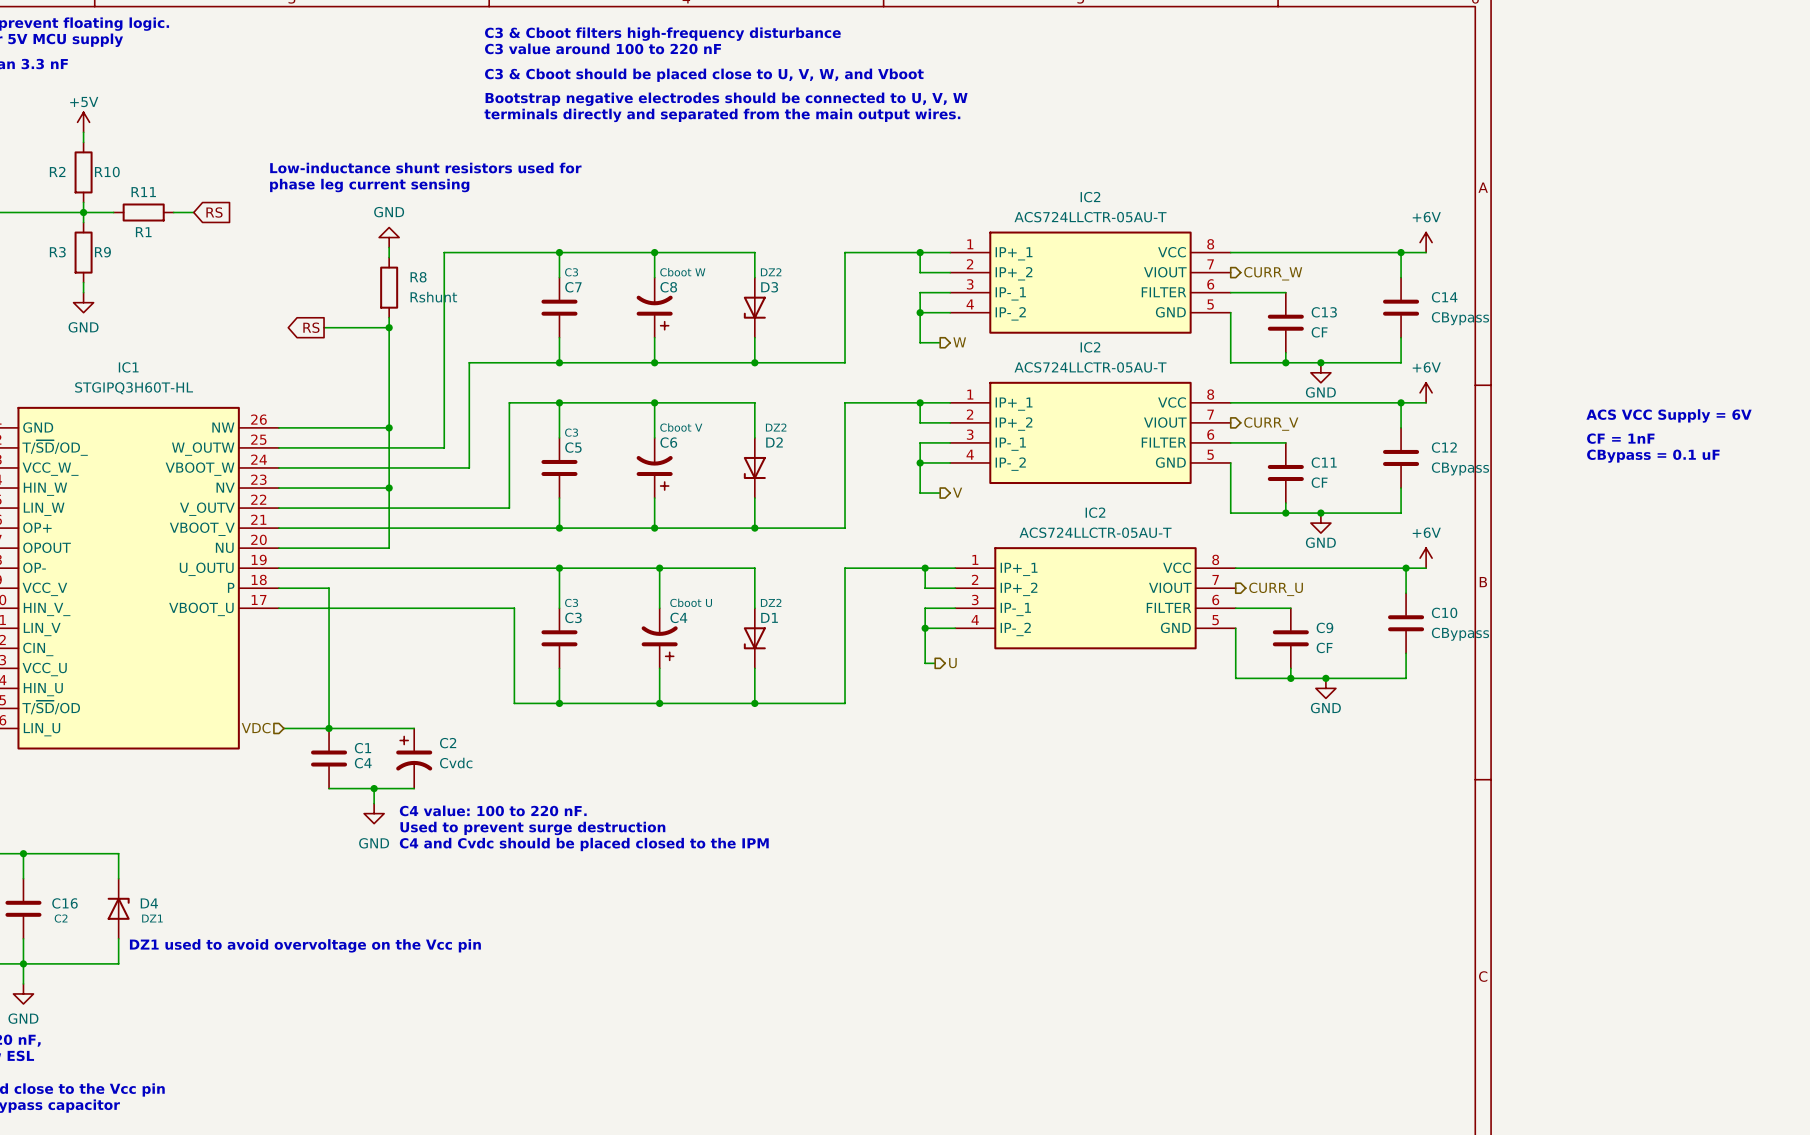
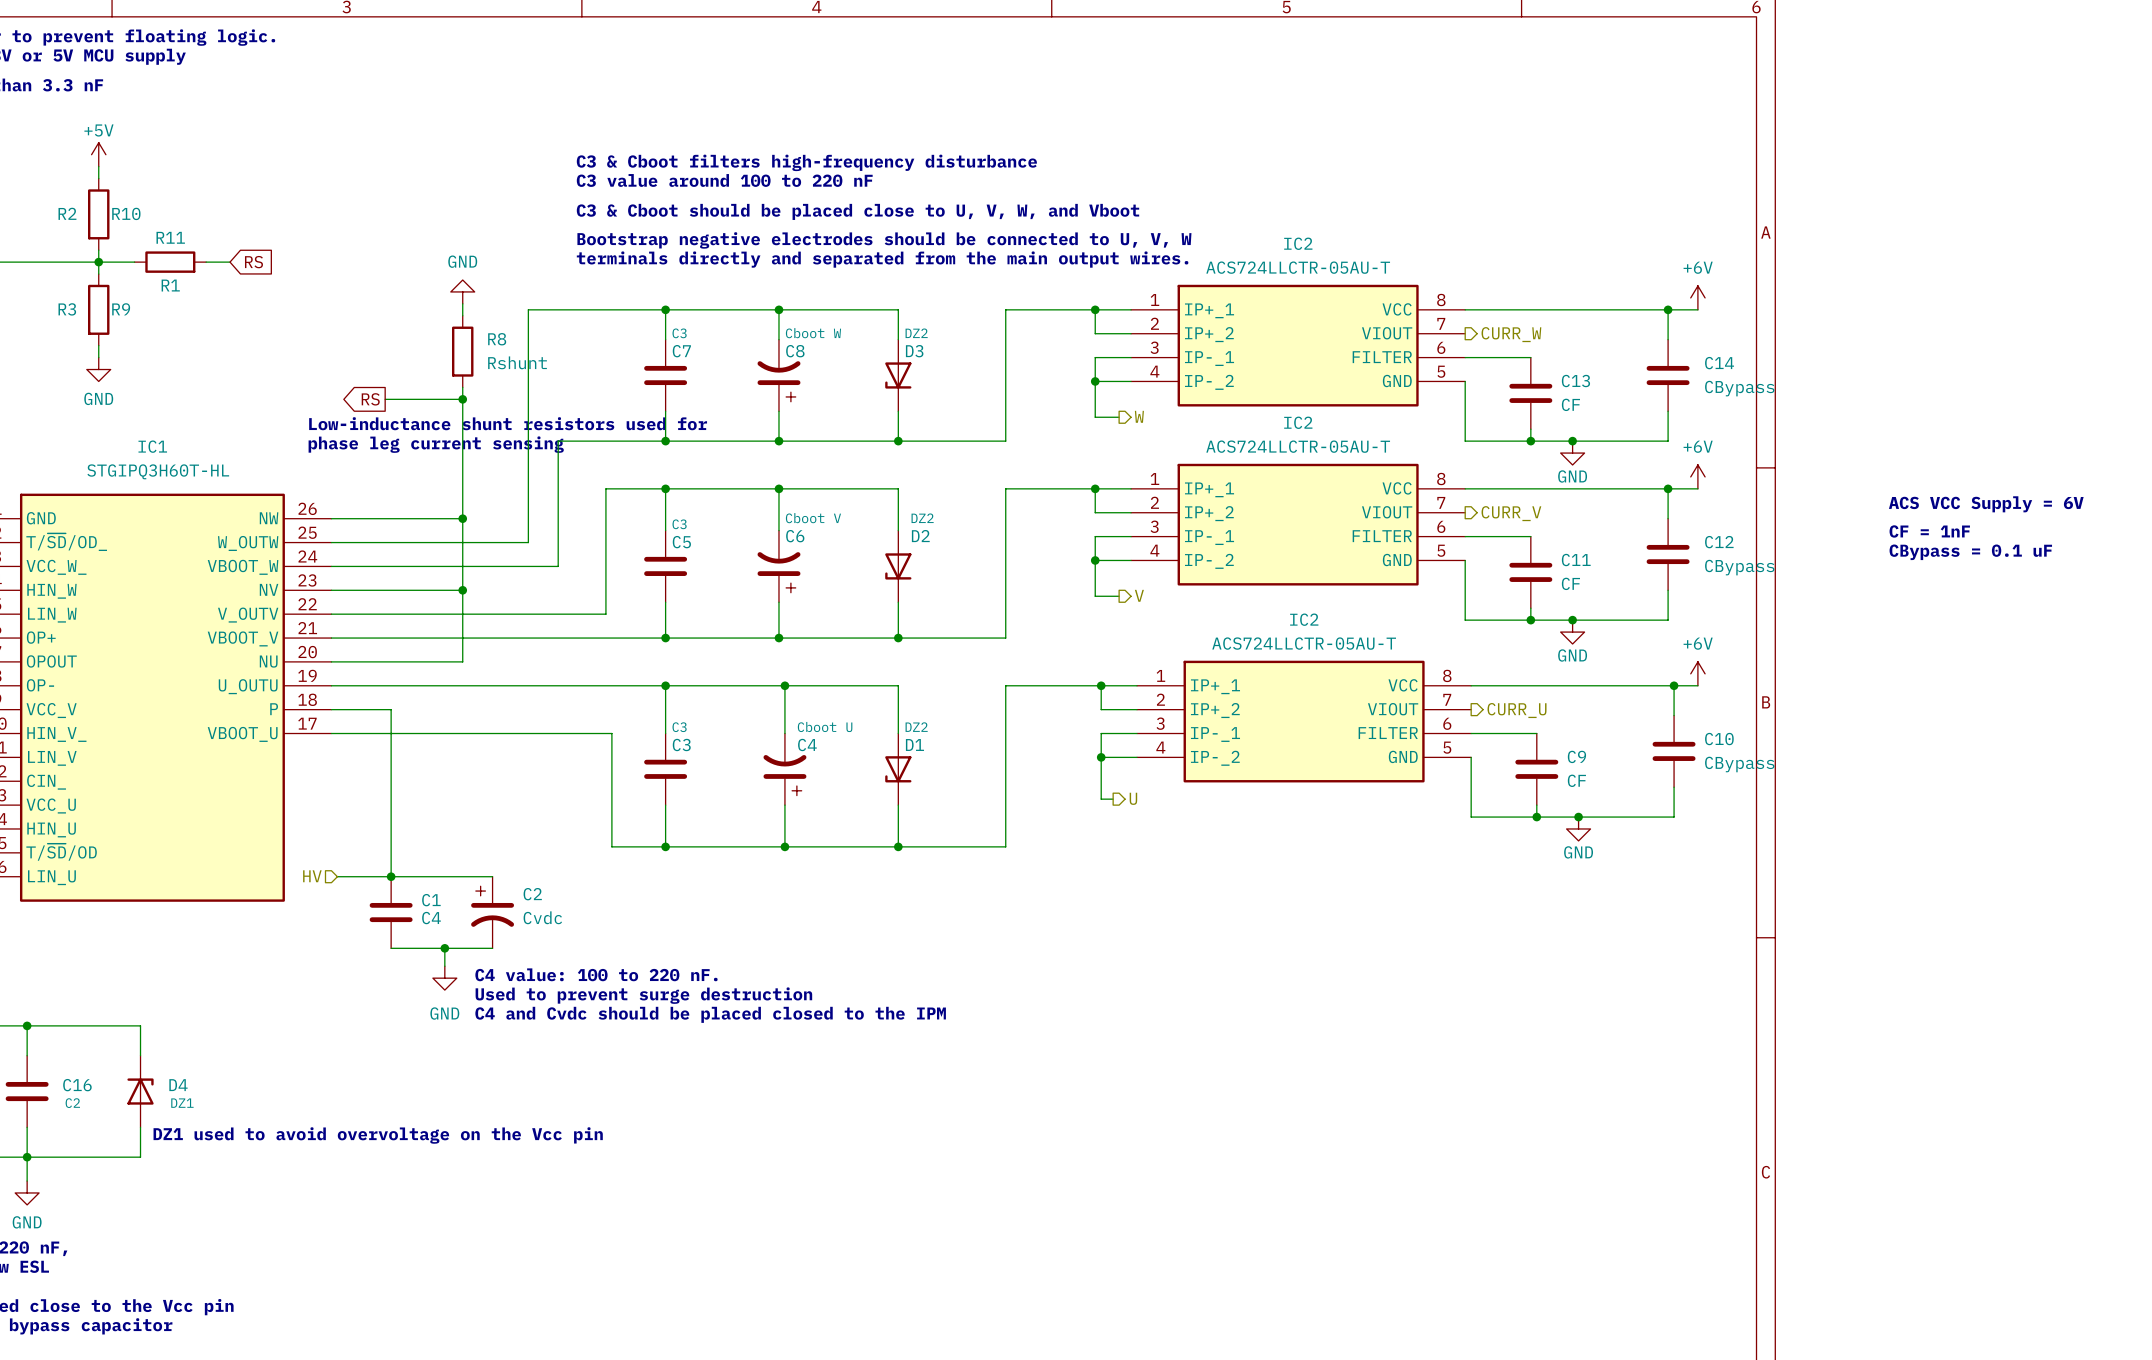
text position: C3 & Cboot filters high-frequency disturbance (662, 34) -> C3 & Cboot filters high-frequency disturbance (806, 162)
text position: C3 value around 100 to 220 nF (603, 48) -> C3 value around 100 to 220 nF (724, 180)
text position: C3 & Cboot should be placed close to U, V, W, and Vboot (704, 75) -> C3 & Cboot should be placed close to U, V, W, and Vboot (857, 211)
text position: Bootstrap negative electrodes should be connected to U, V, W (726, 99) -> Bootstrap negative electrodes should be connected to U, V, W (884, 240)
text position: terminals directly and separated from the main output wires. (722, 115) -> terminals directly and separated from the main output wires. (882, 259)
text position: Low-inductance shunt resistors used for (425, 168) -> Low-inductance shunt resistors used for (508, 423)
text position: phase leg current sensing (369, 185) -> phase leg current sensing (436, 444)
hierarchical label: VDC (256, 728) -> HV (312, 876)

